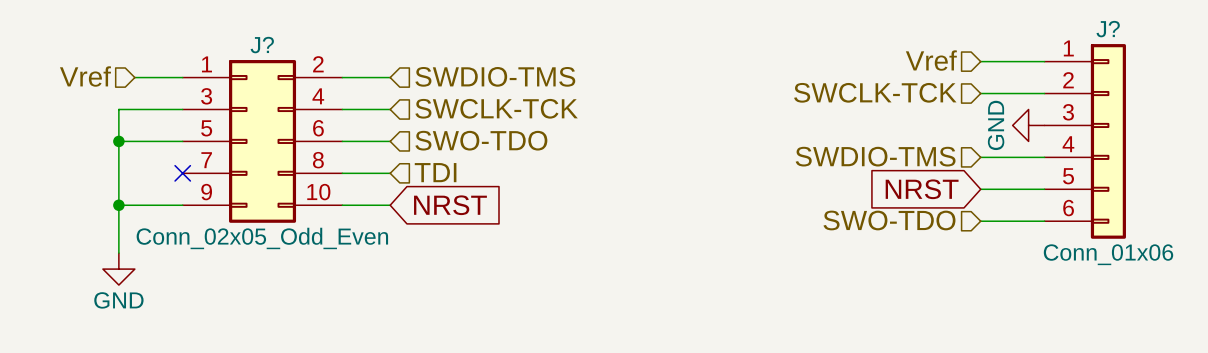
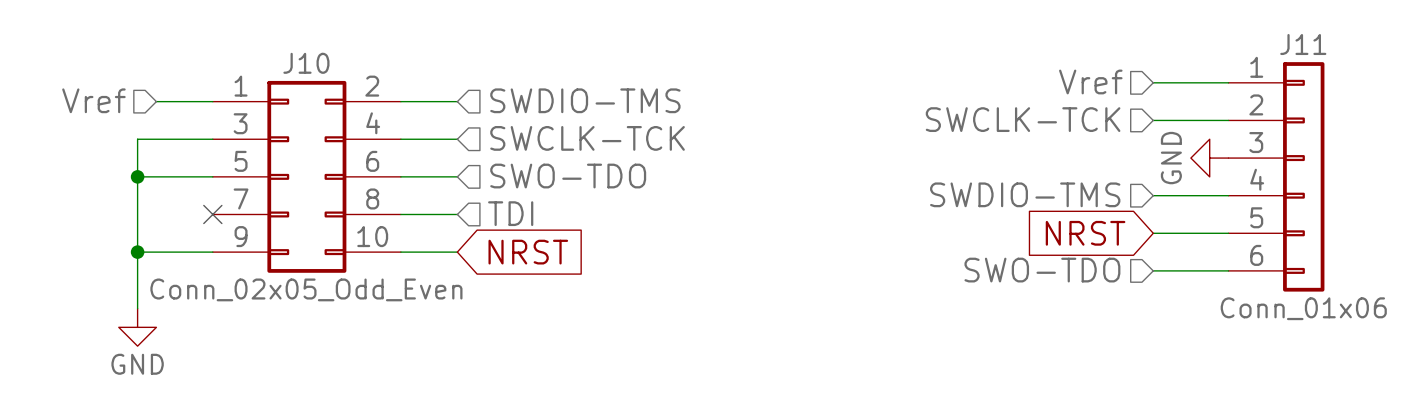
J? name: J? (1108, 29) -> J11 (1303, 44)
J? name: J? (262, 45) -> J10 (306, 63)

